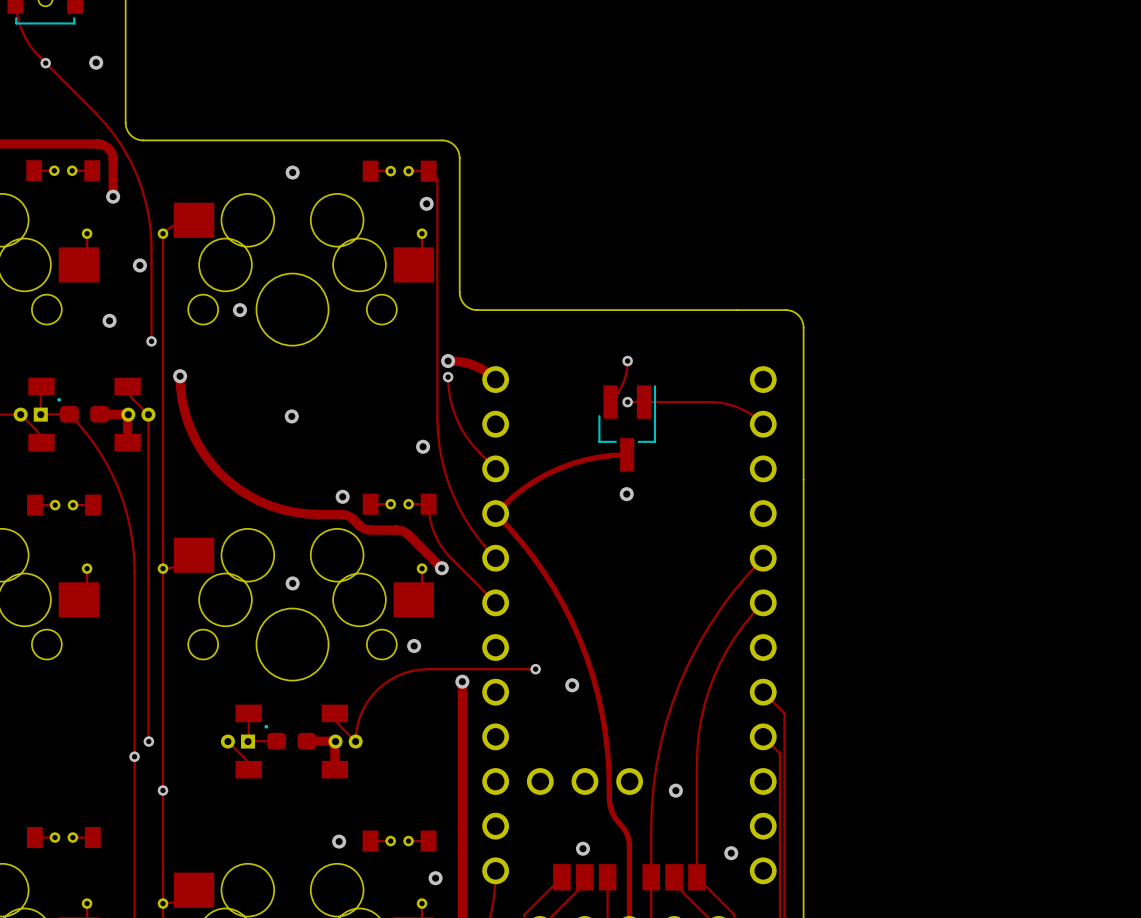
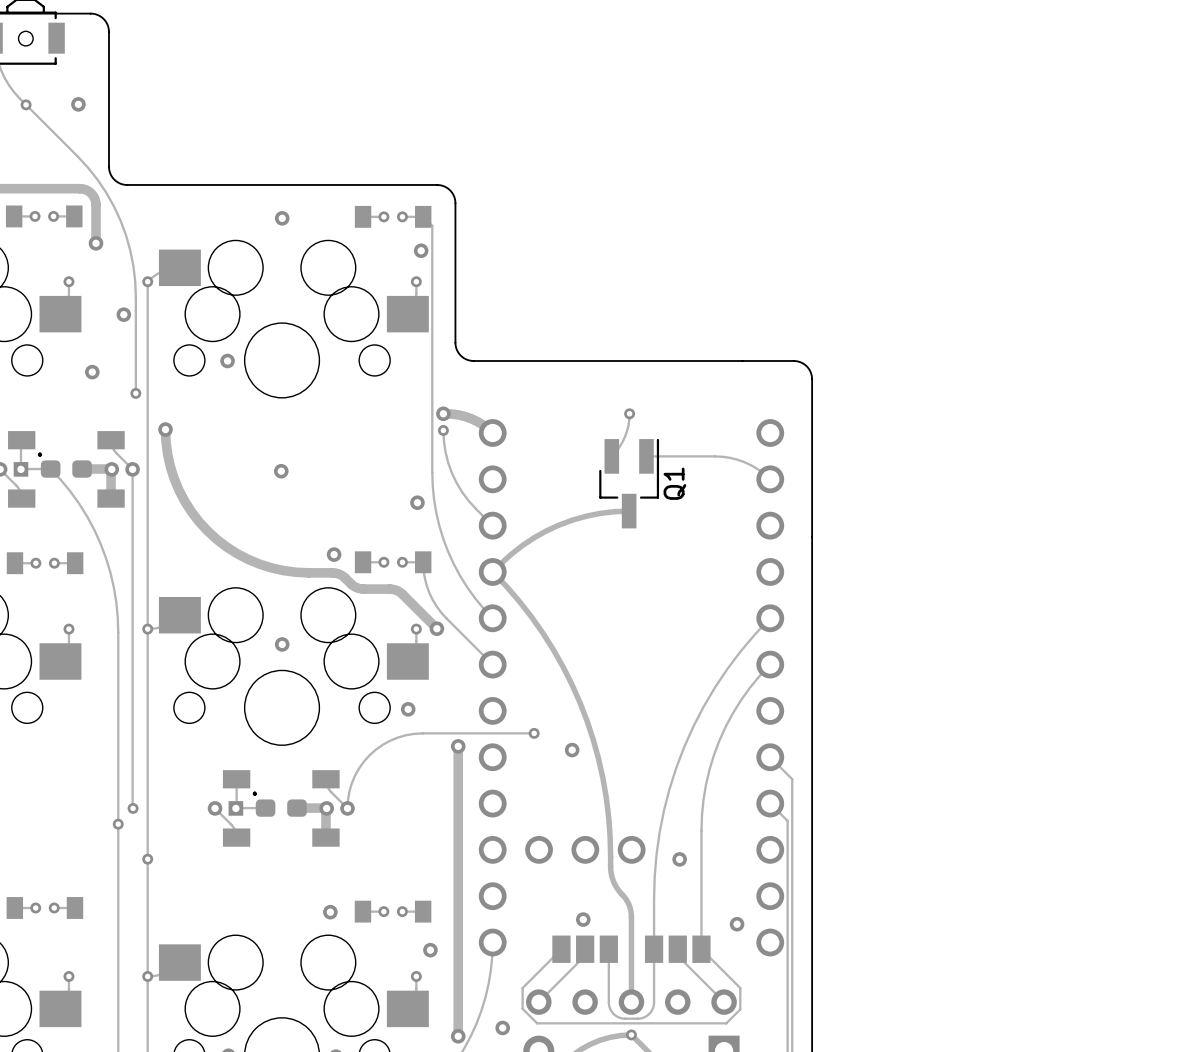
via: (627, 402) -> none
Q1 name: none -> Q1 (674, 483)
via: (626, 494) -> none

